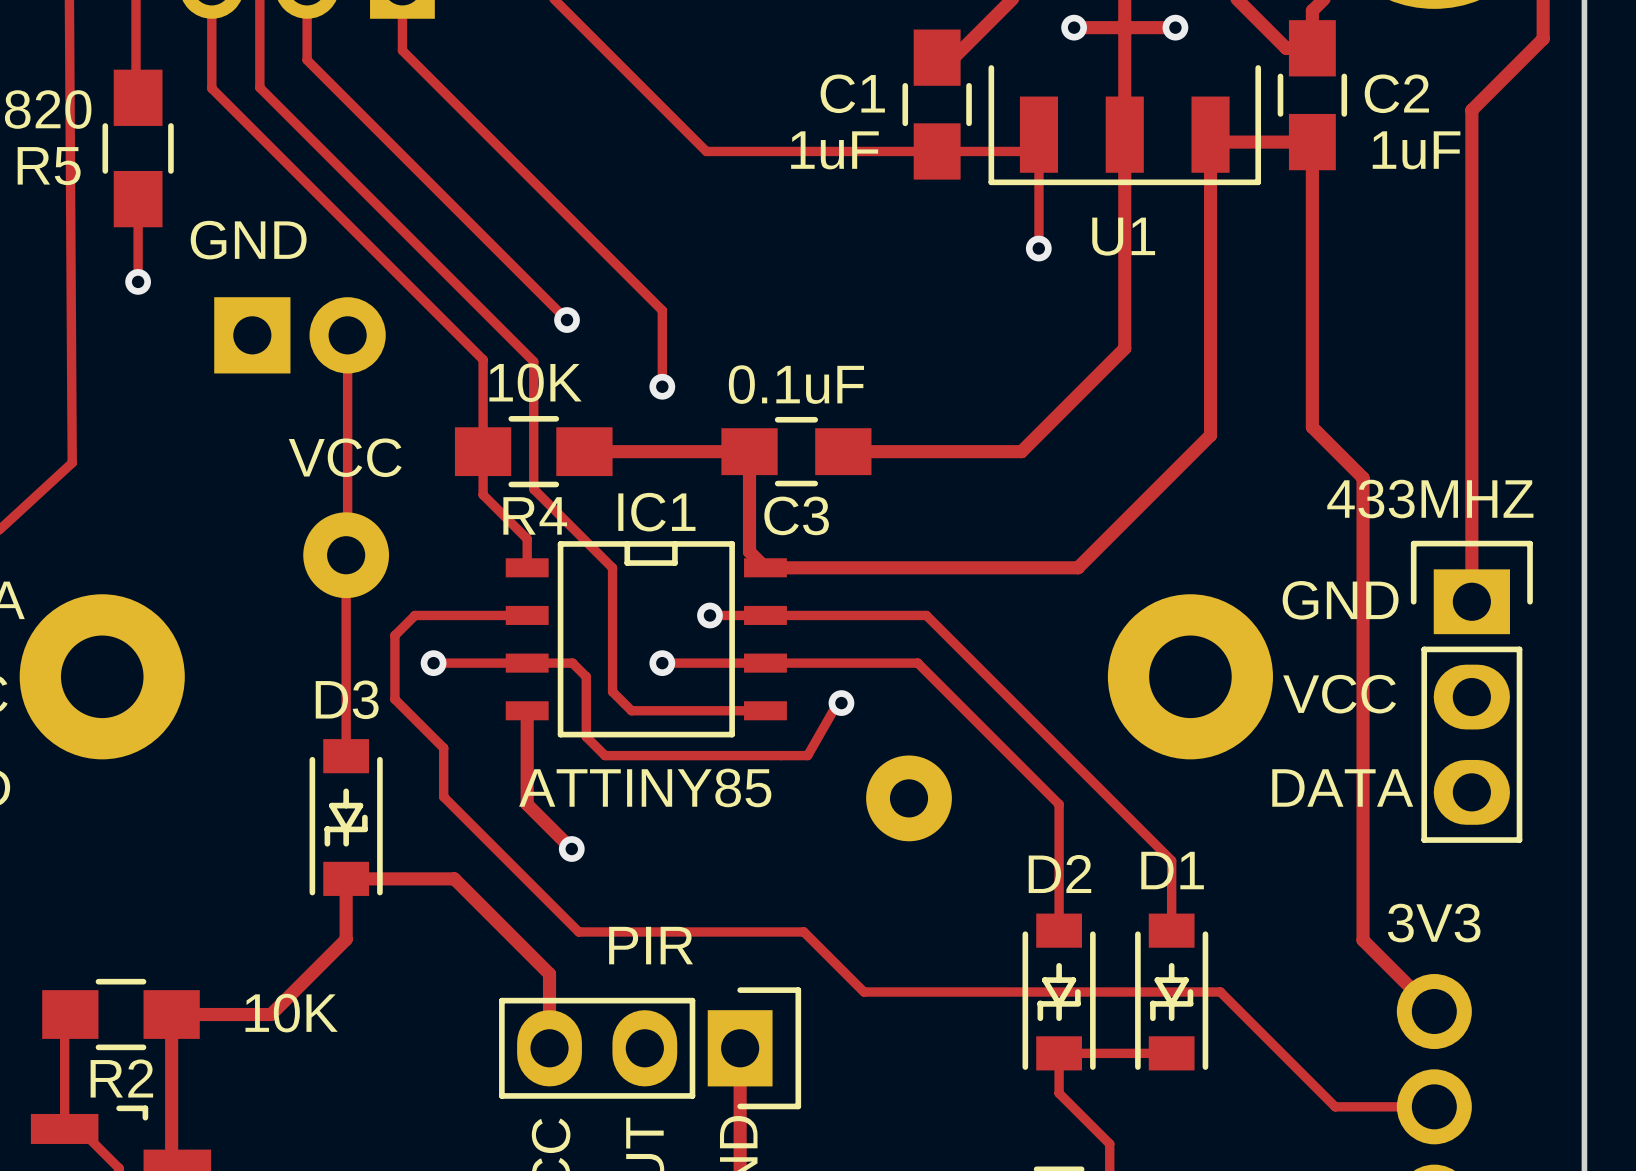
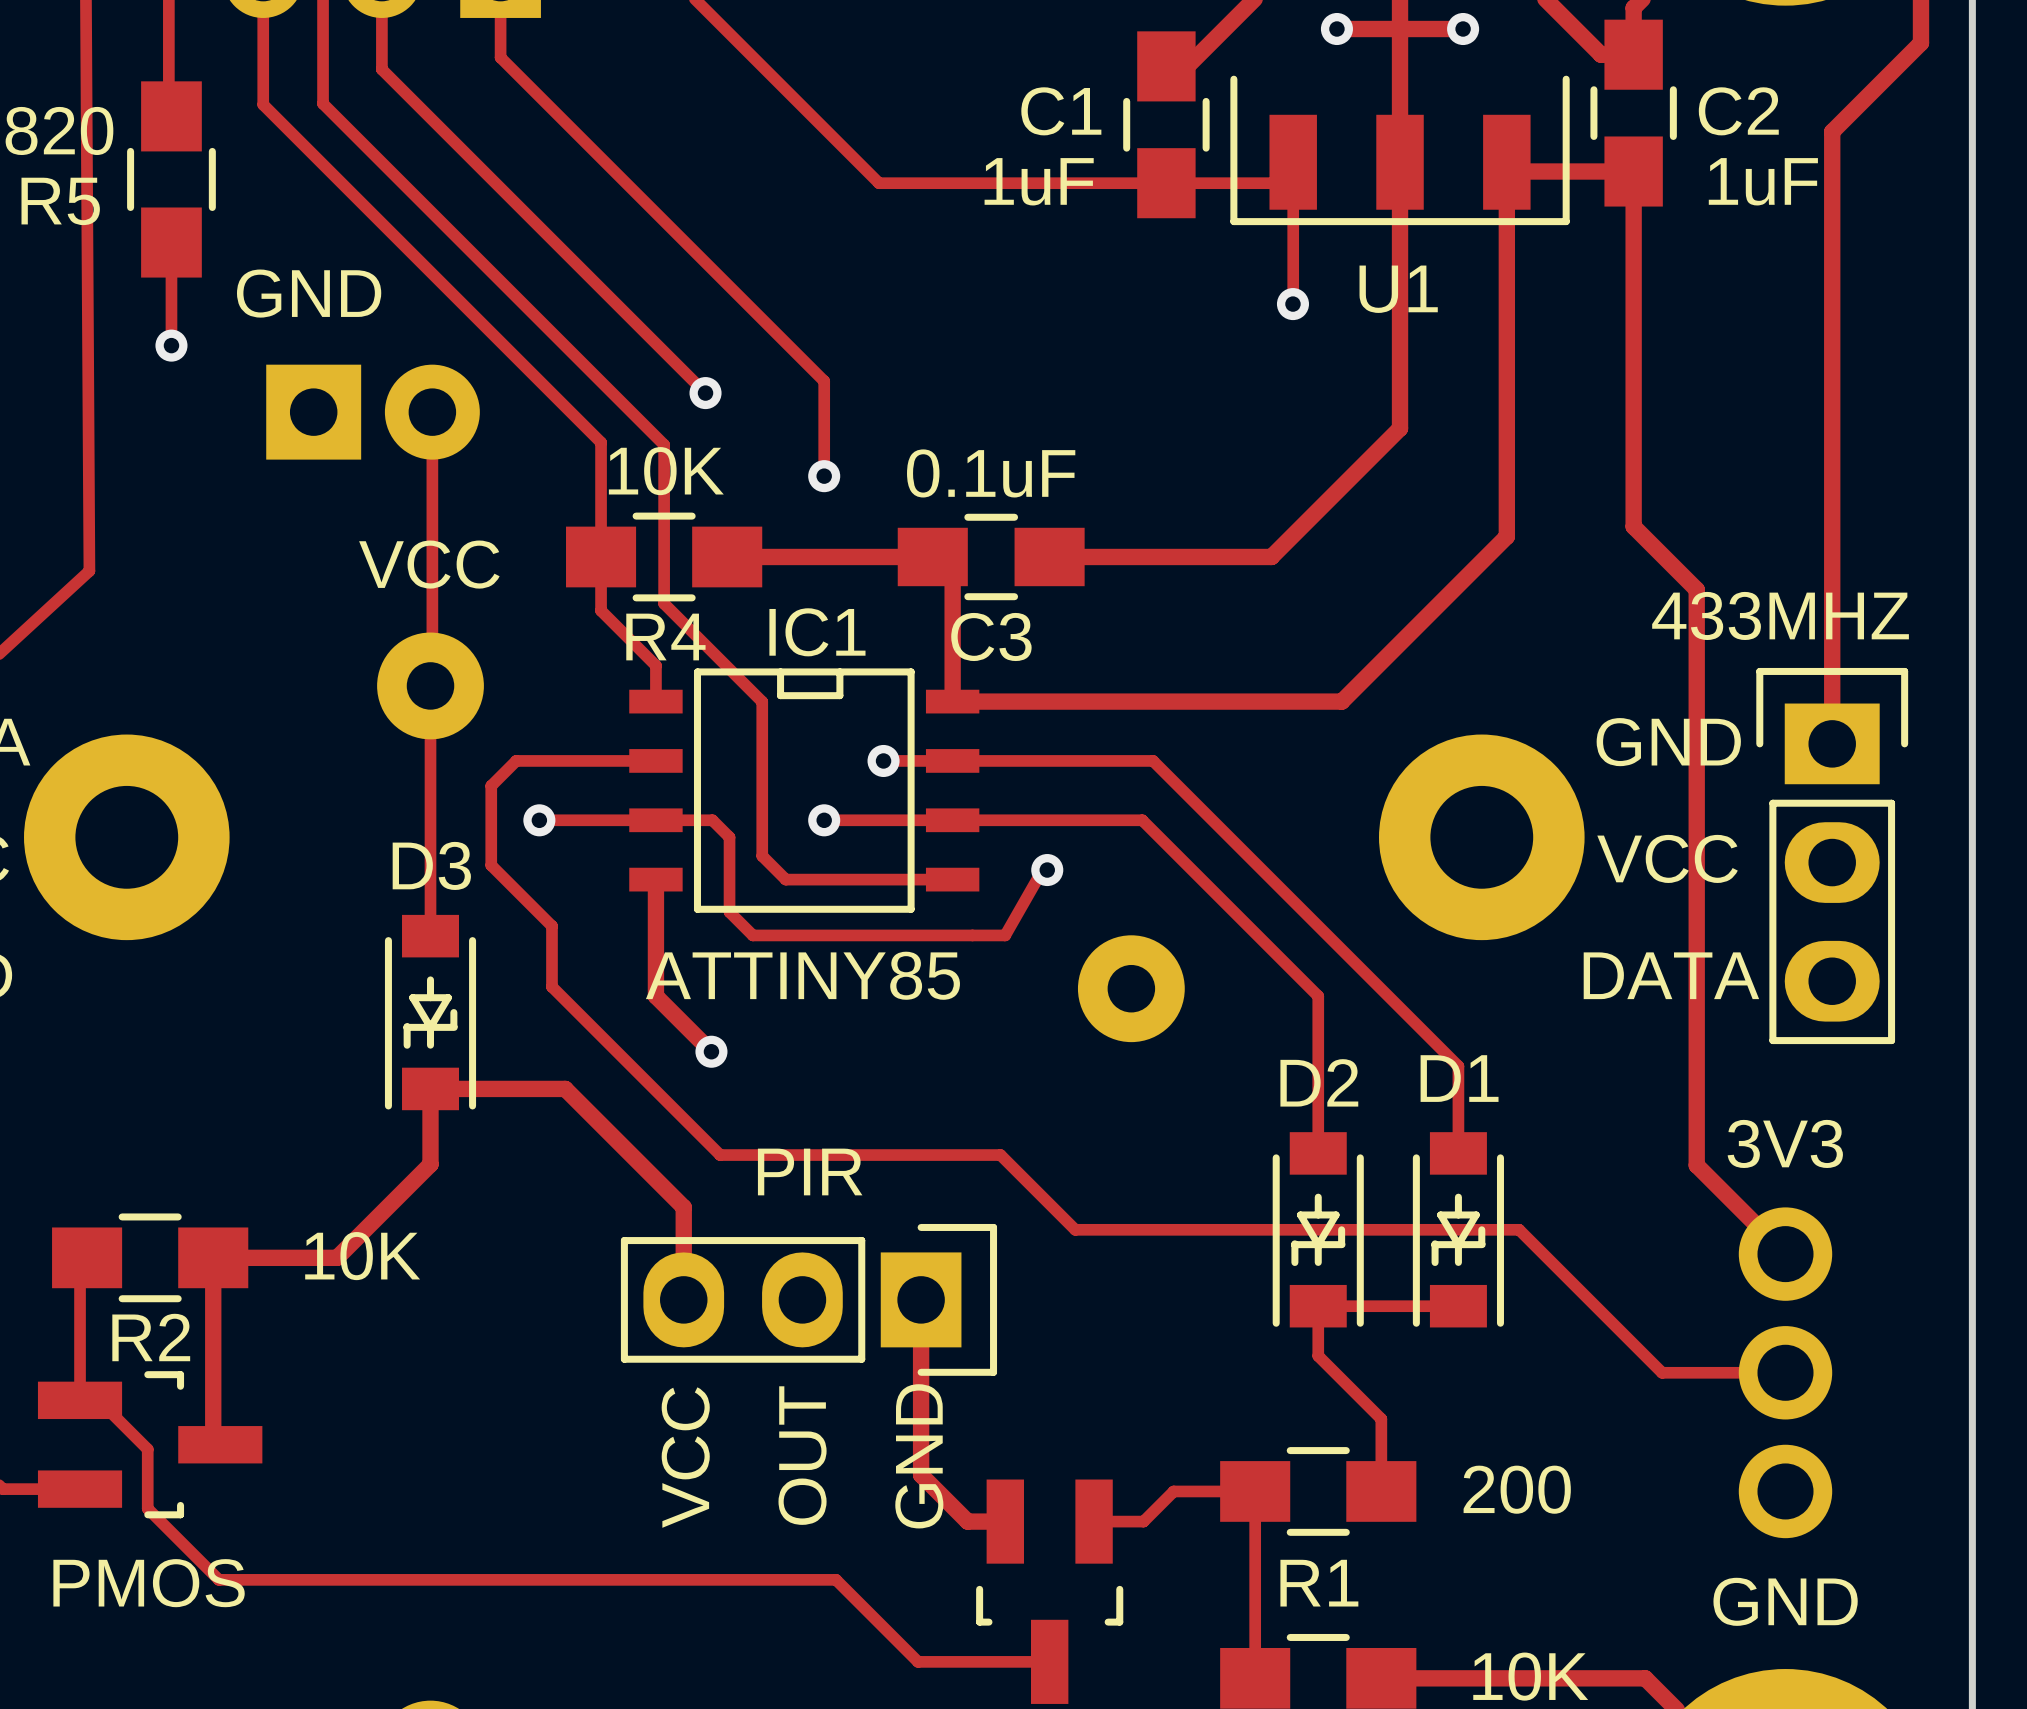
track: (749, 451) (749, 551) (765, 567) -> (932, 556) (952, 576) (952, 701)

